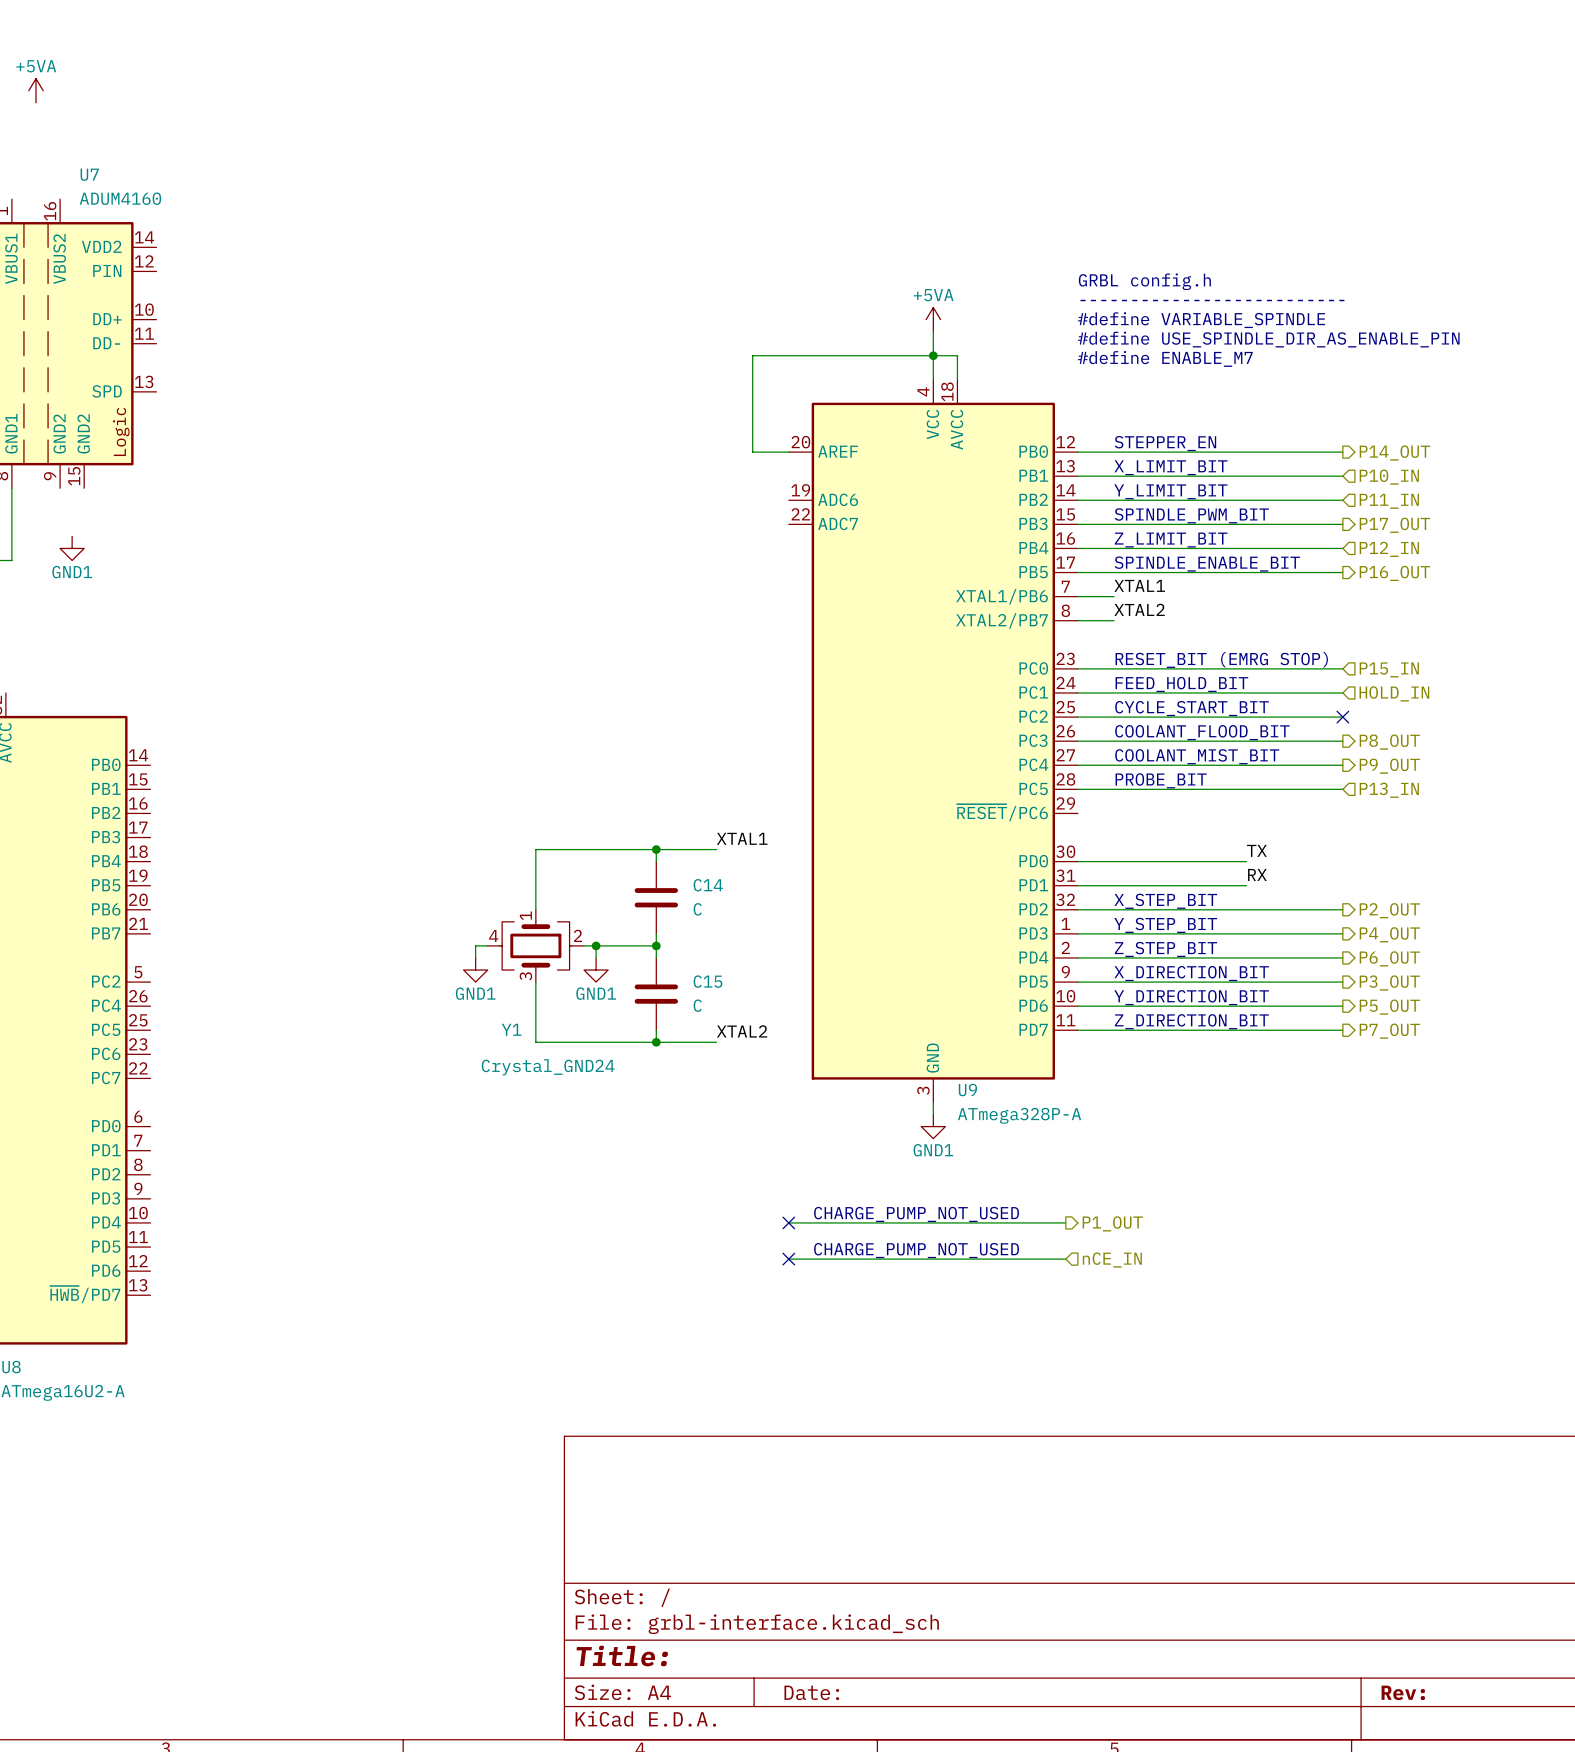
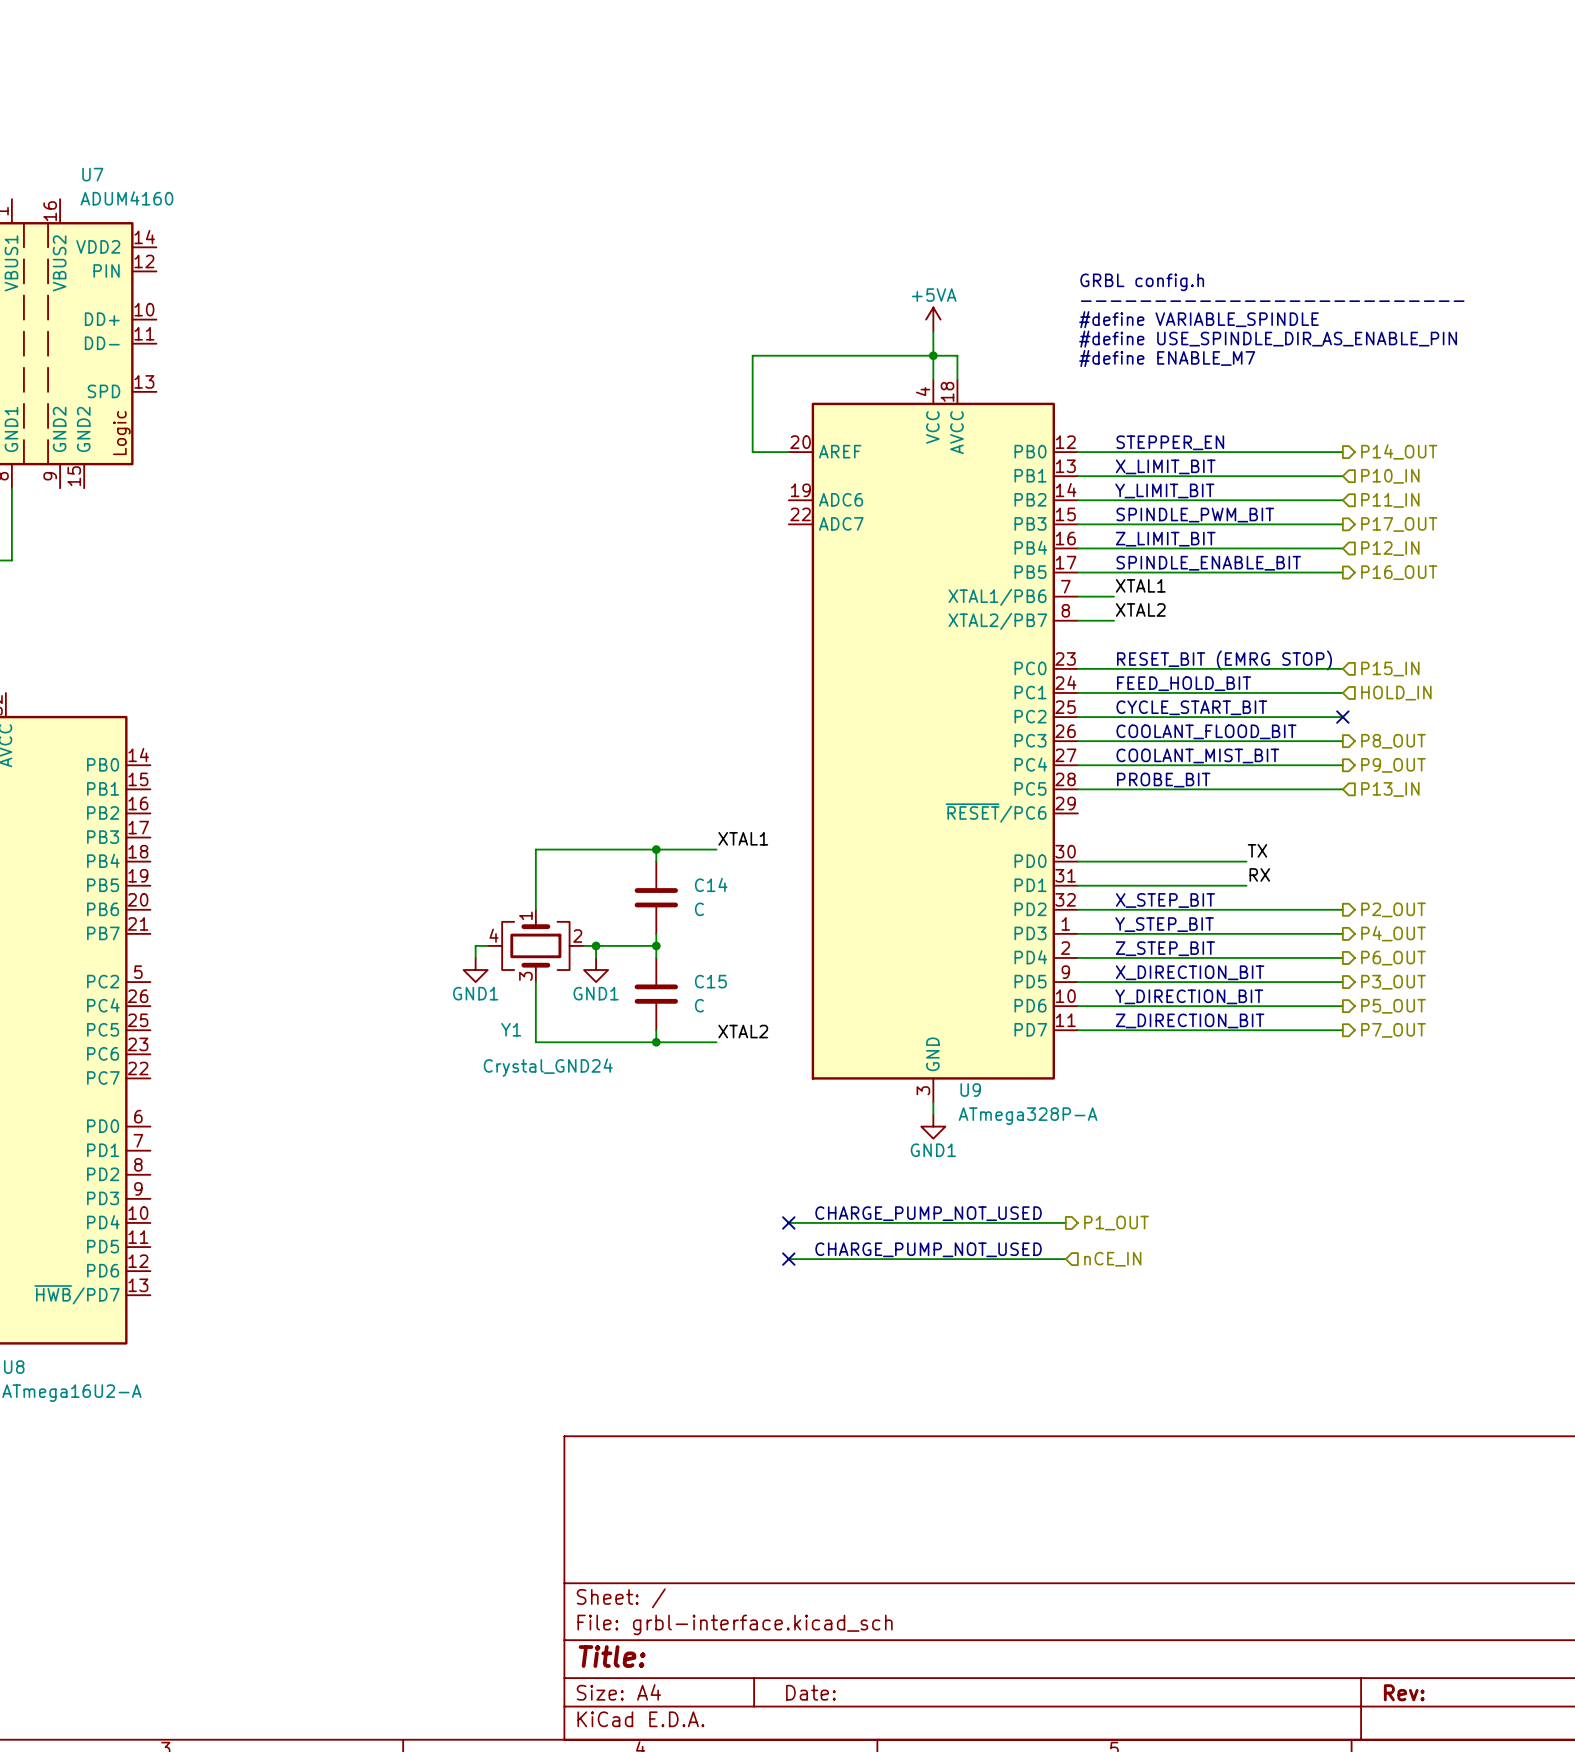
power symbol: +5VA (36, 90) -> none
power symbol: GND1 (72, 548) -> none

